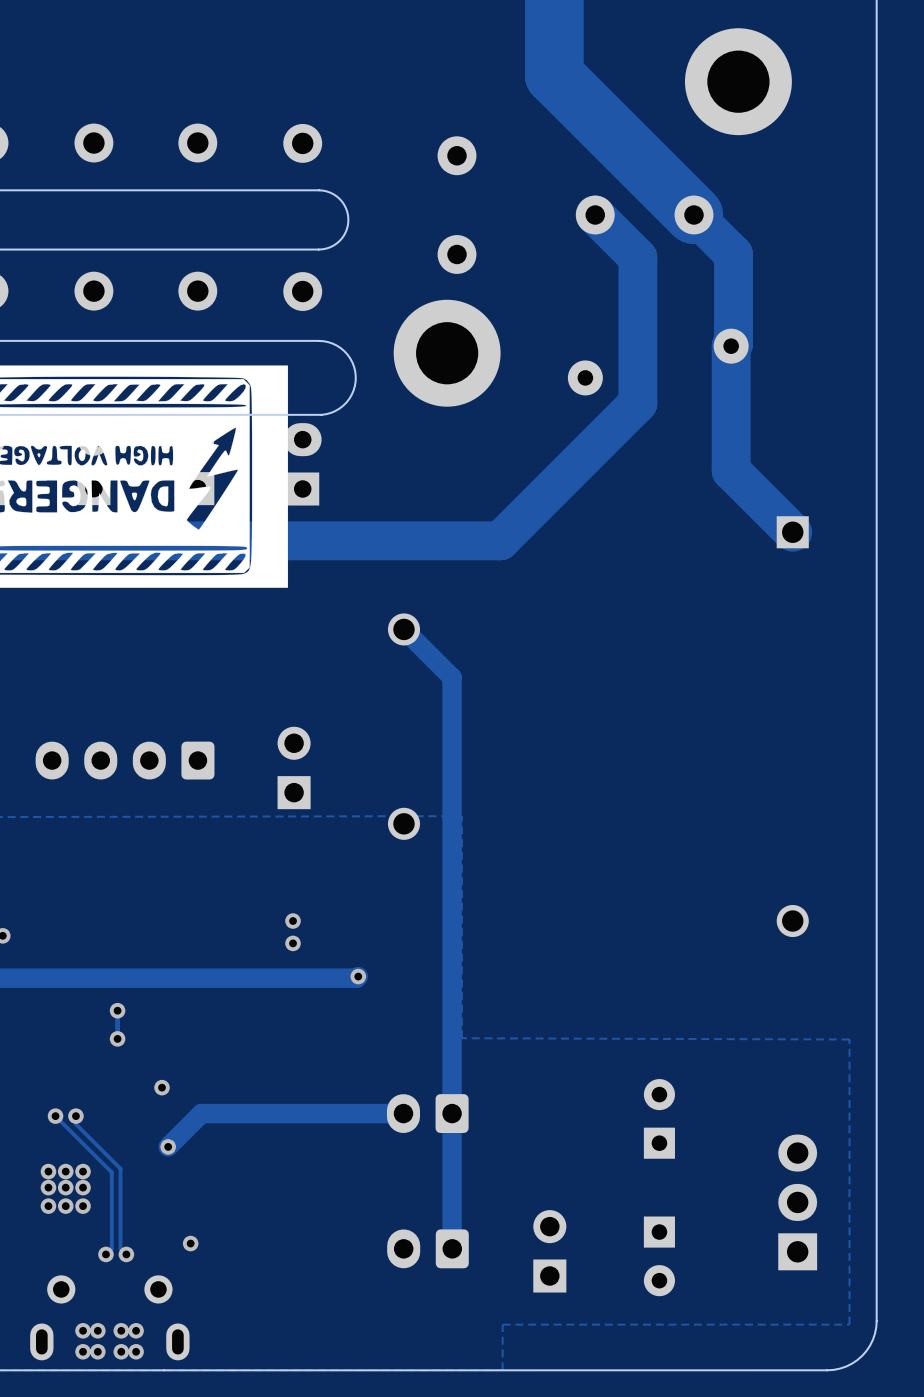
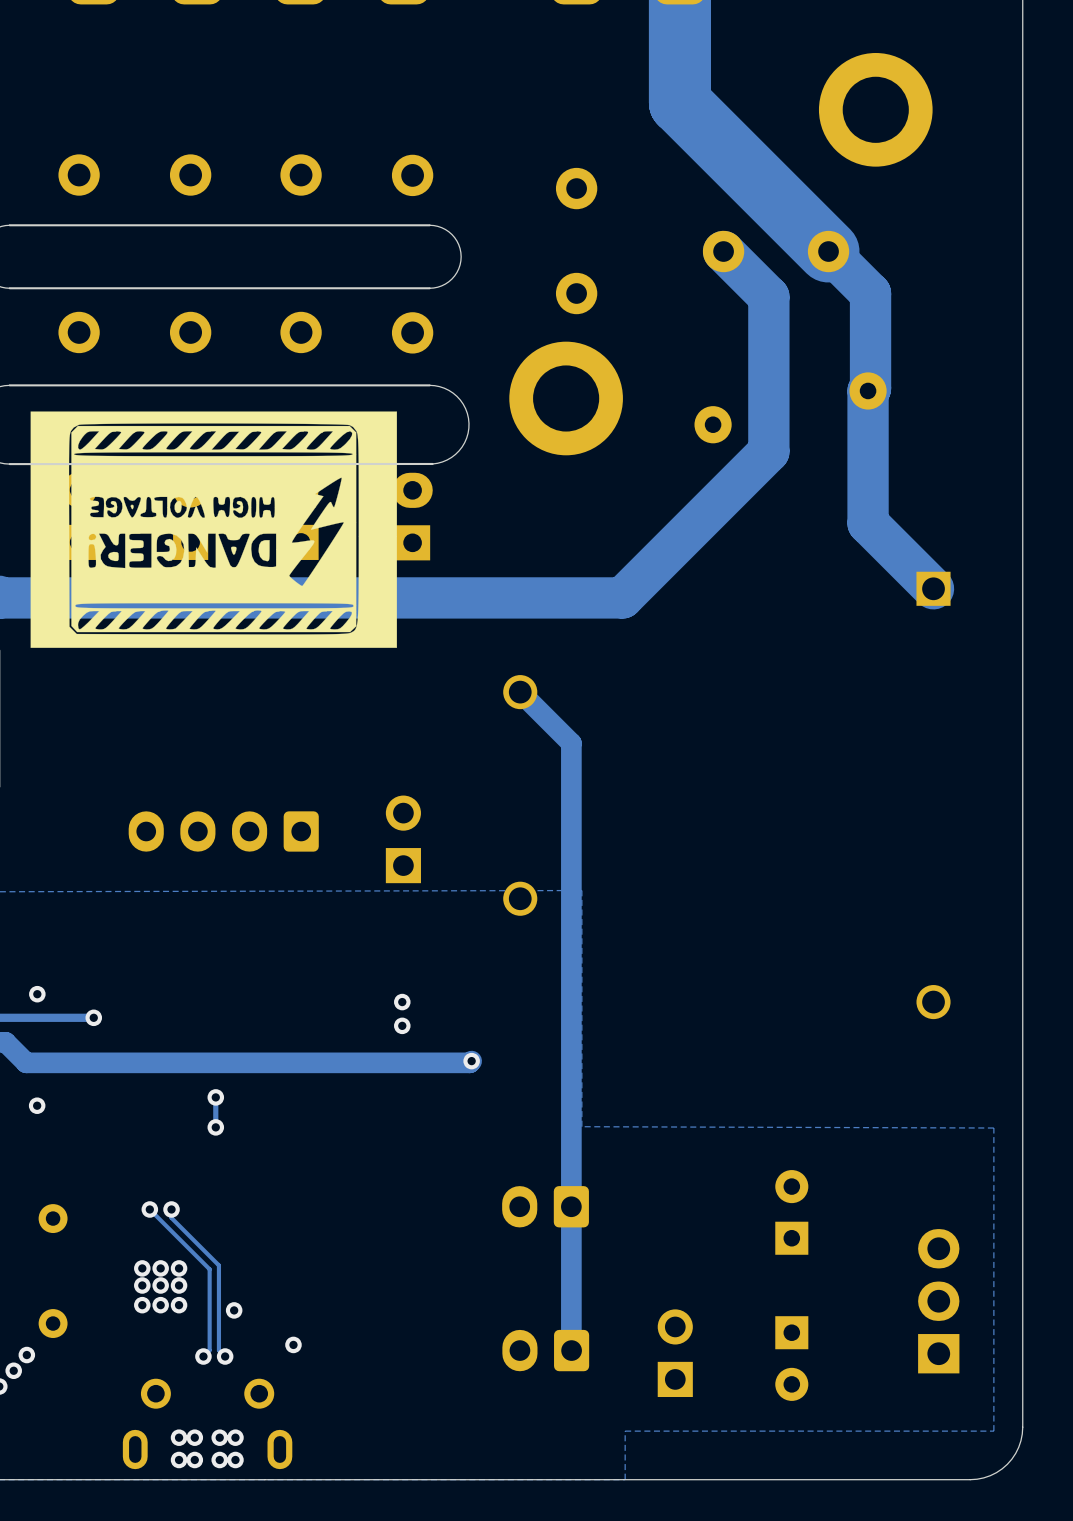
via: (162, 1087) -> none
track: (403, 1113) (201, 1113) (168, 1146) -> none
via: (168, 1146) -> none
via: none -> (234, 1310)

